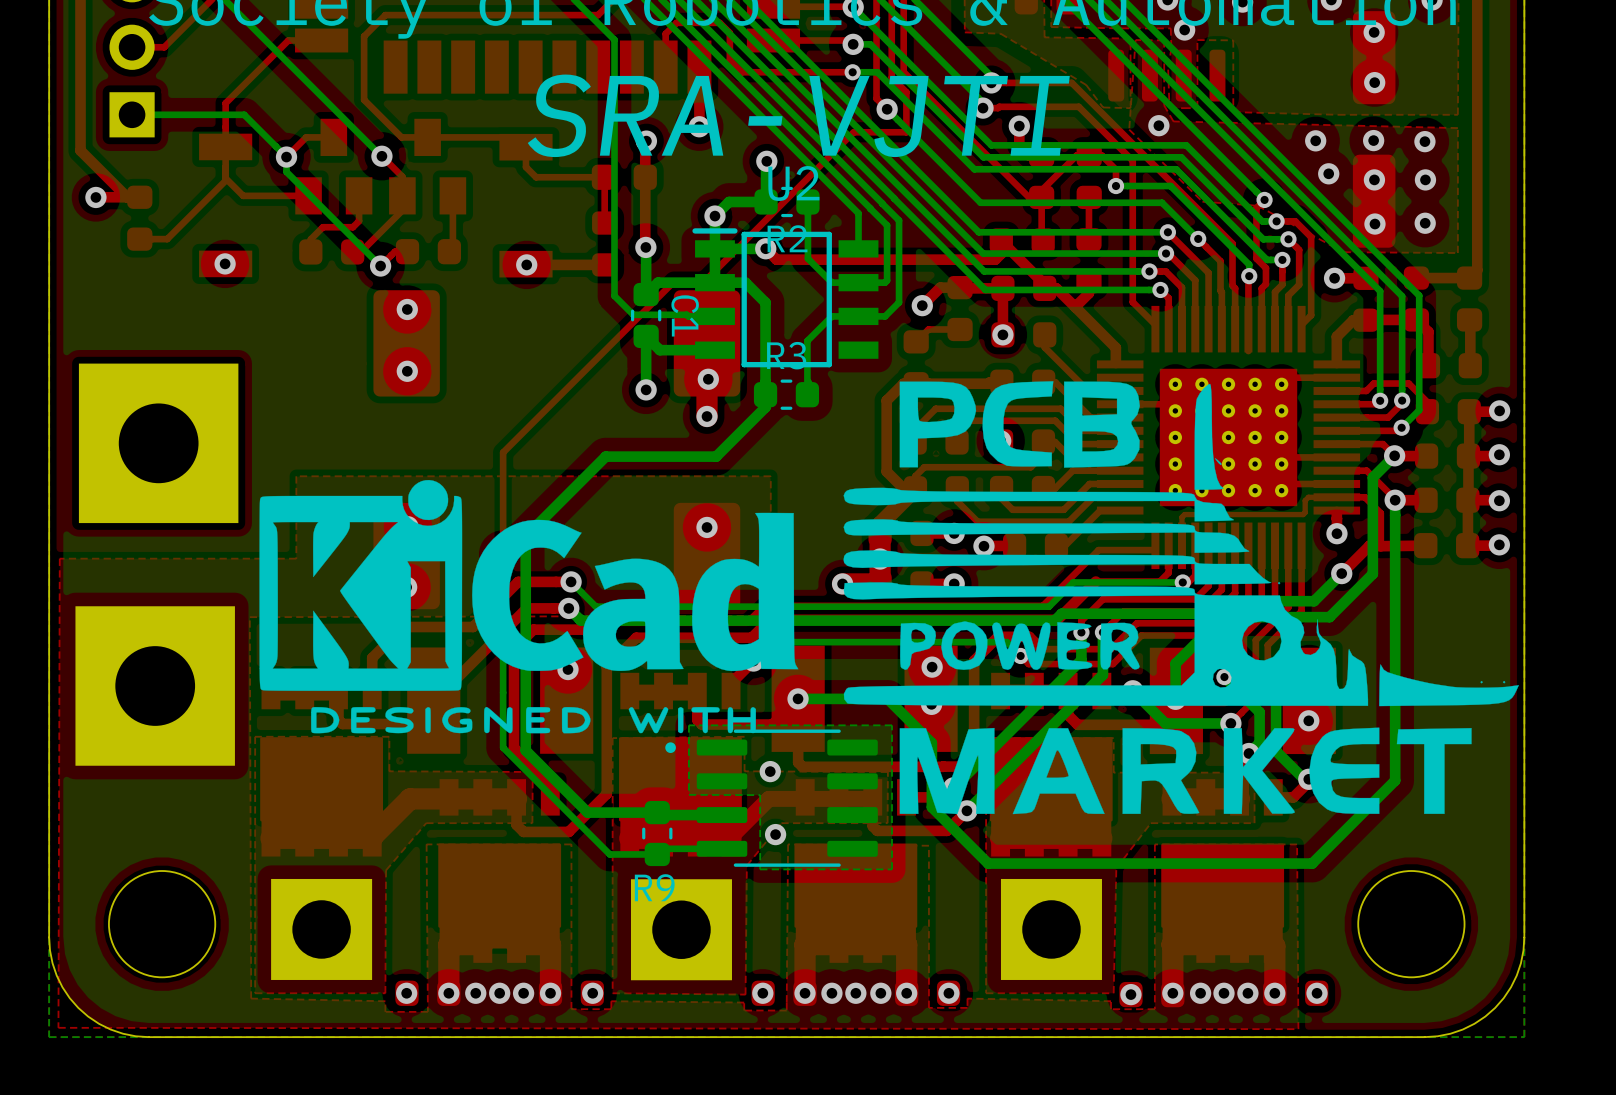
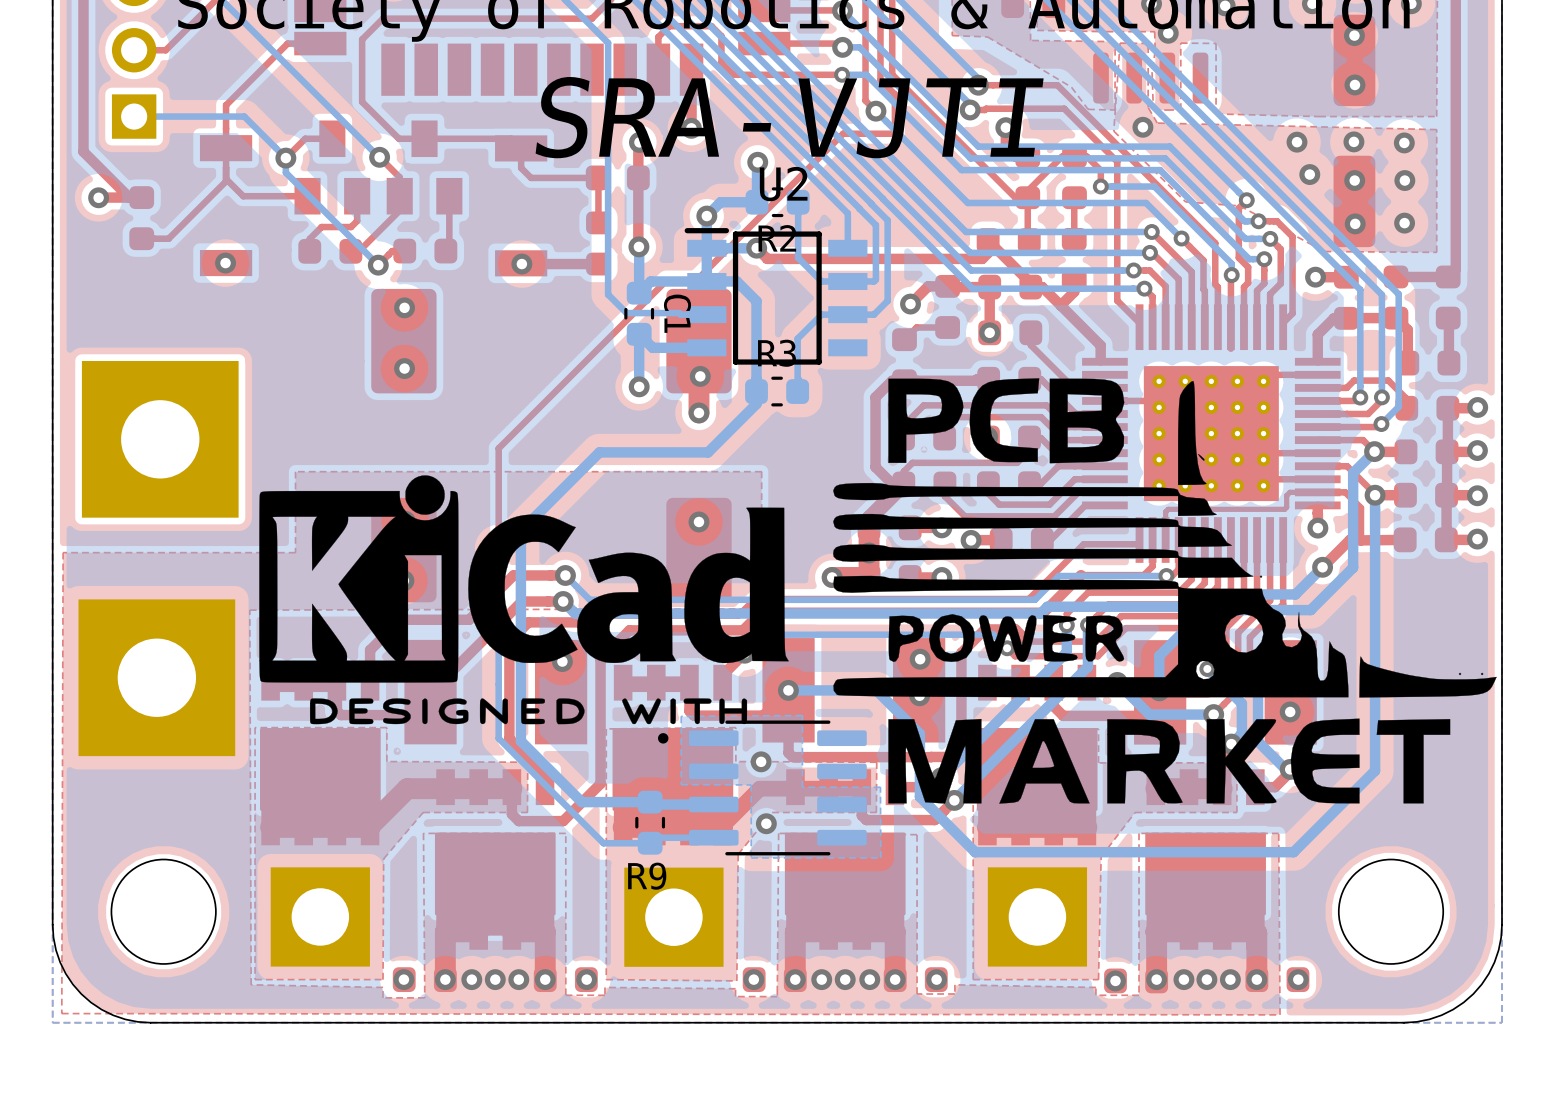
bottom zone outline: (688, 725) (892, 725) (892, 869) -> (681, 716) (802, 715) (802, 787) (880, 787) (880, 857)

